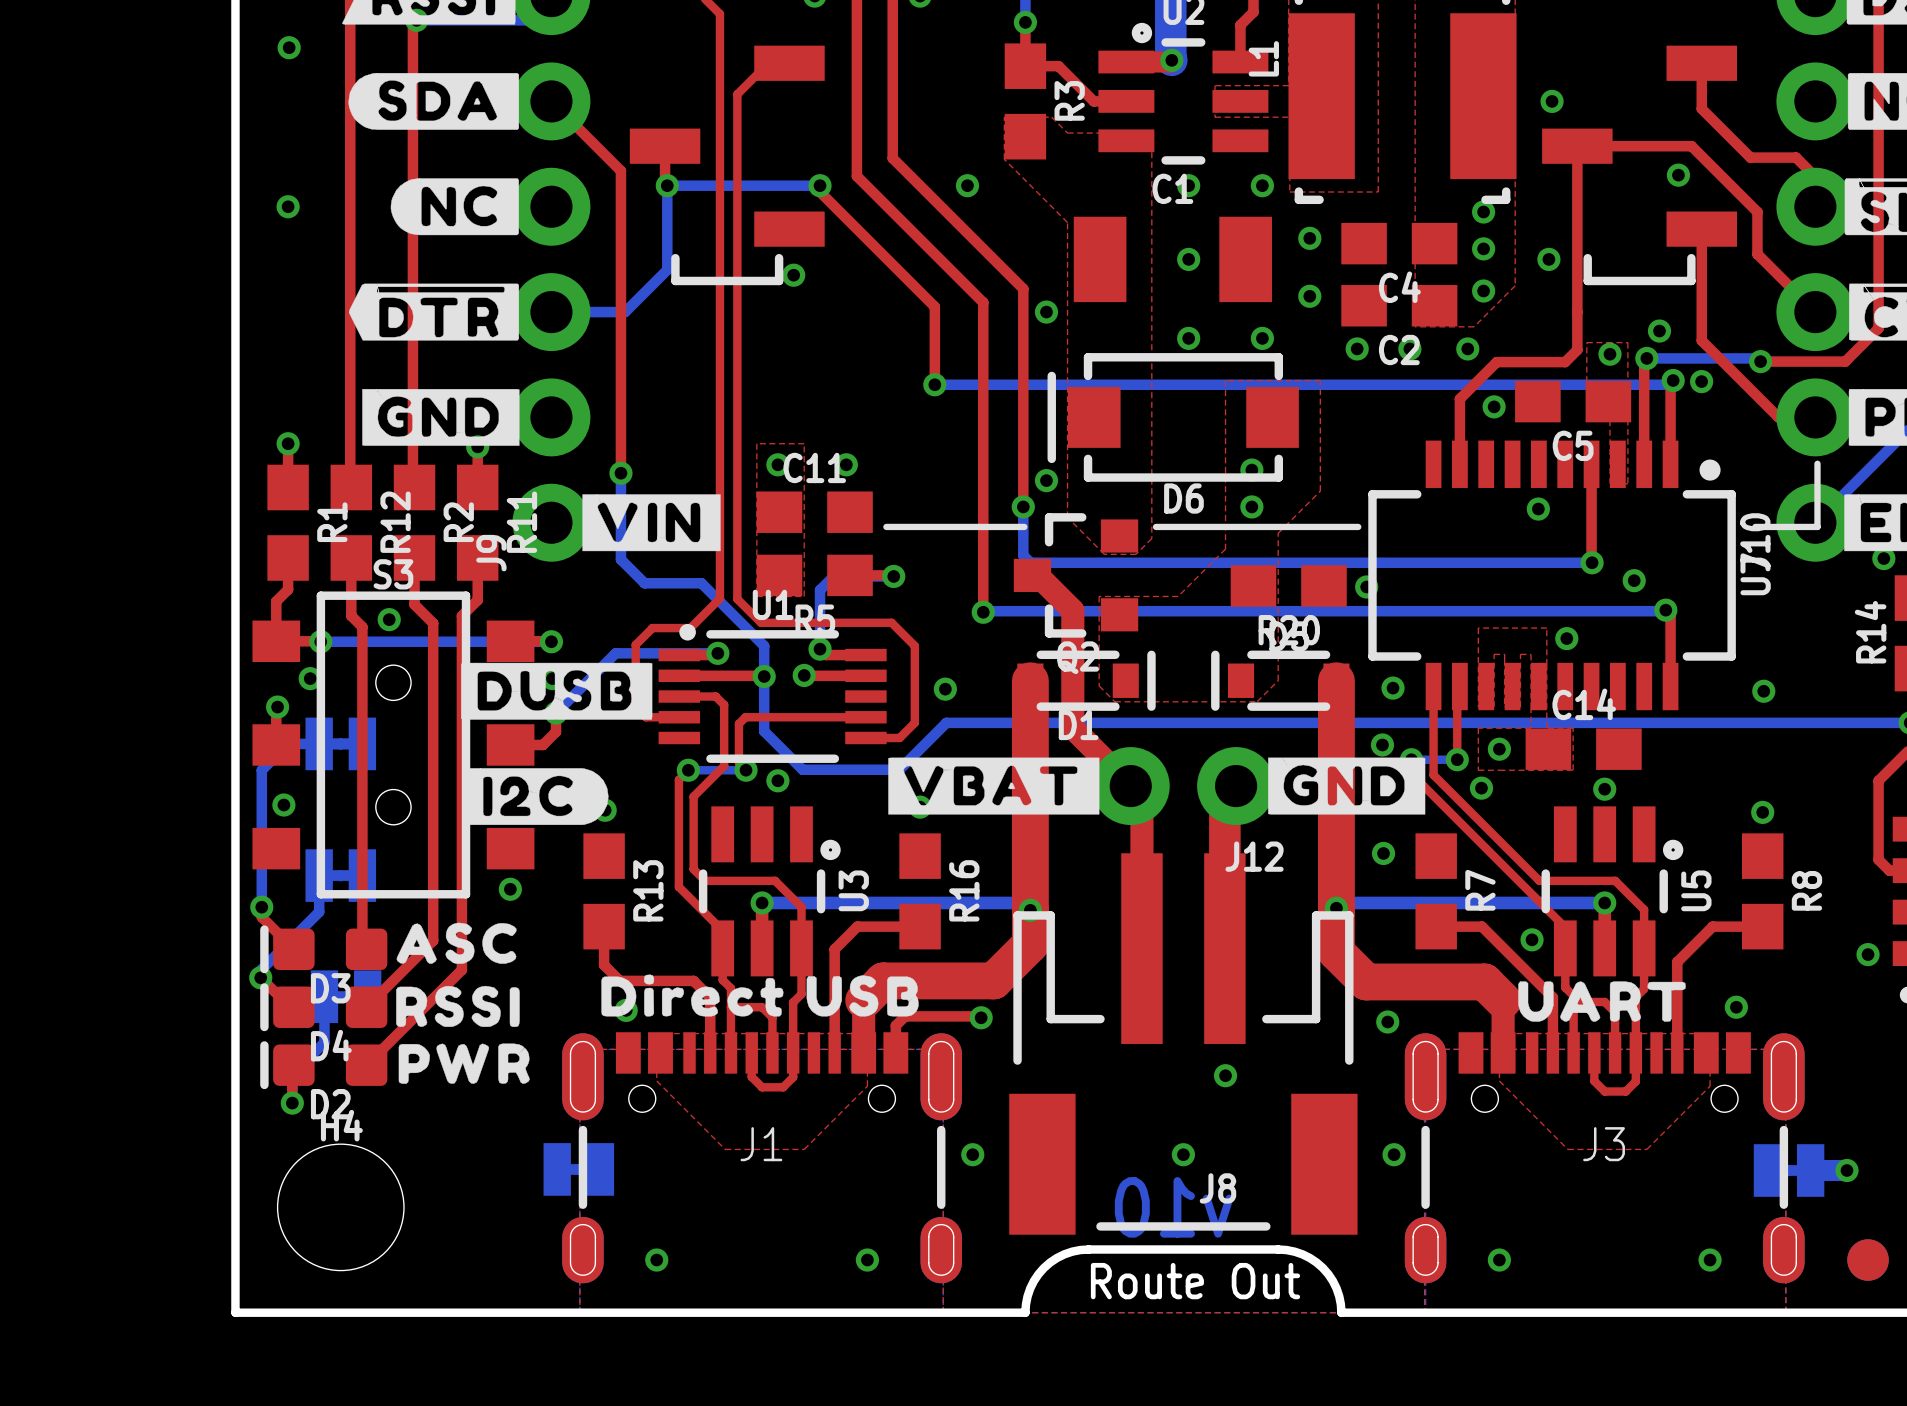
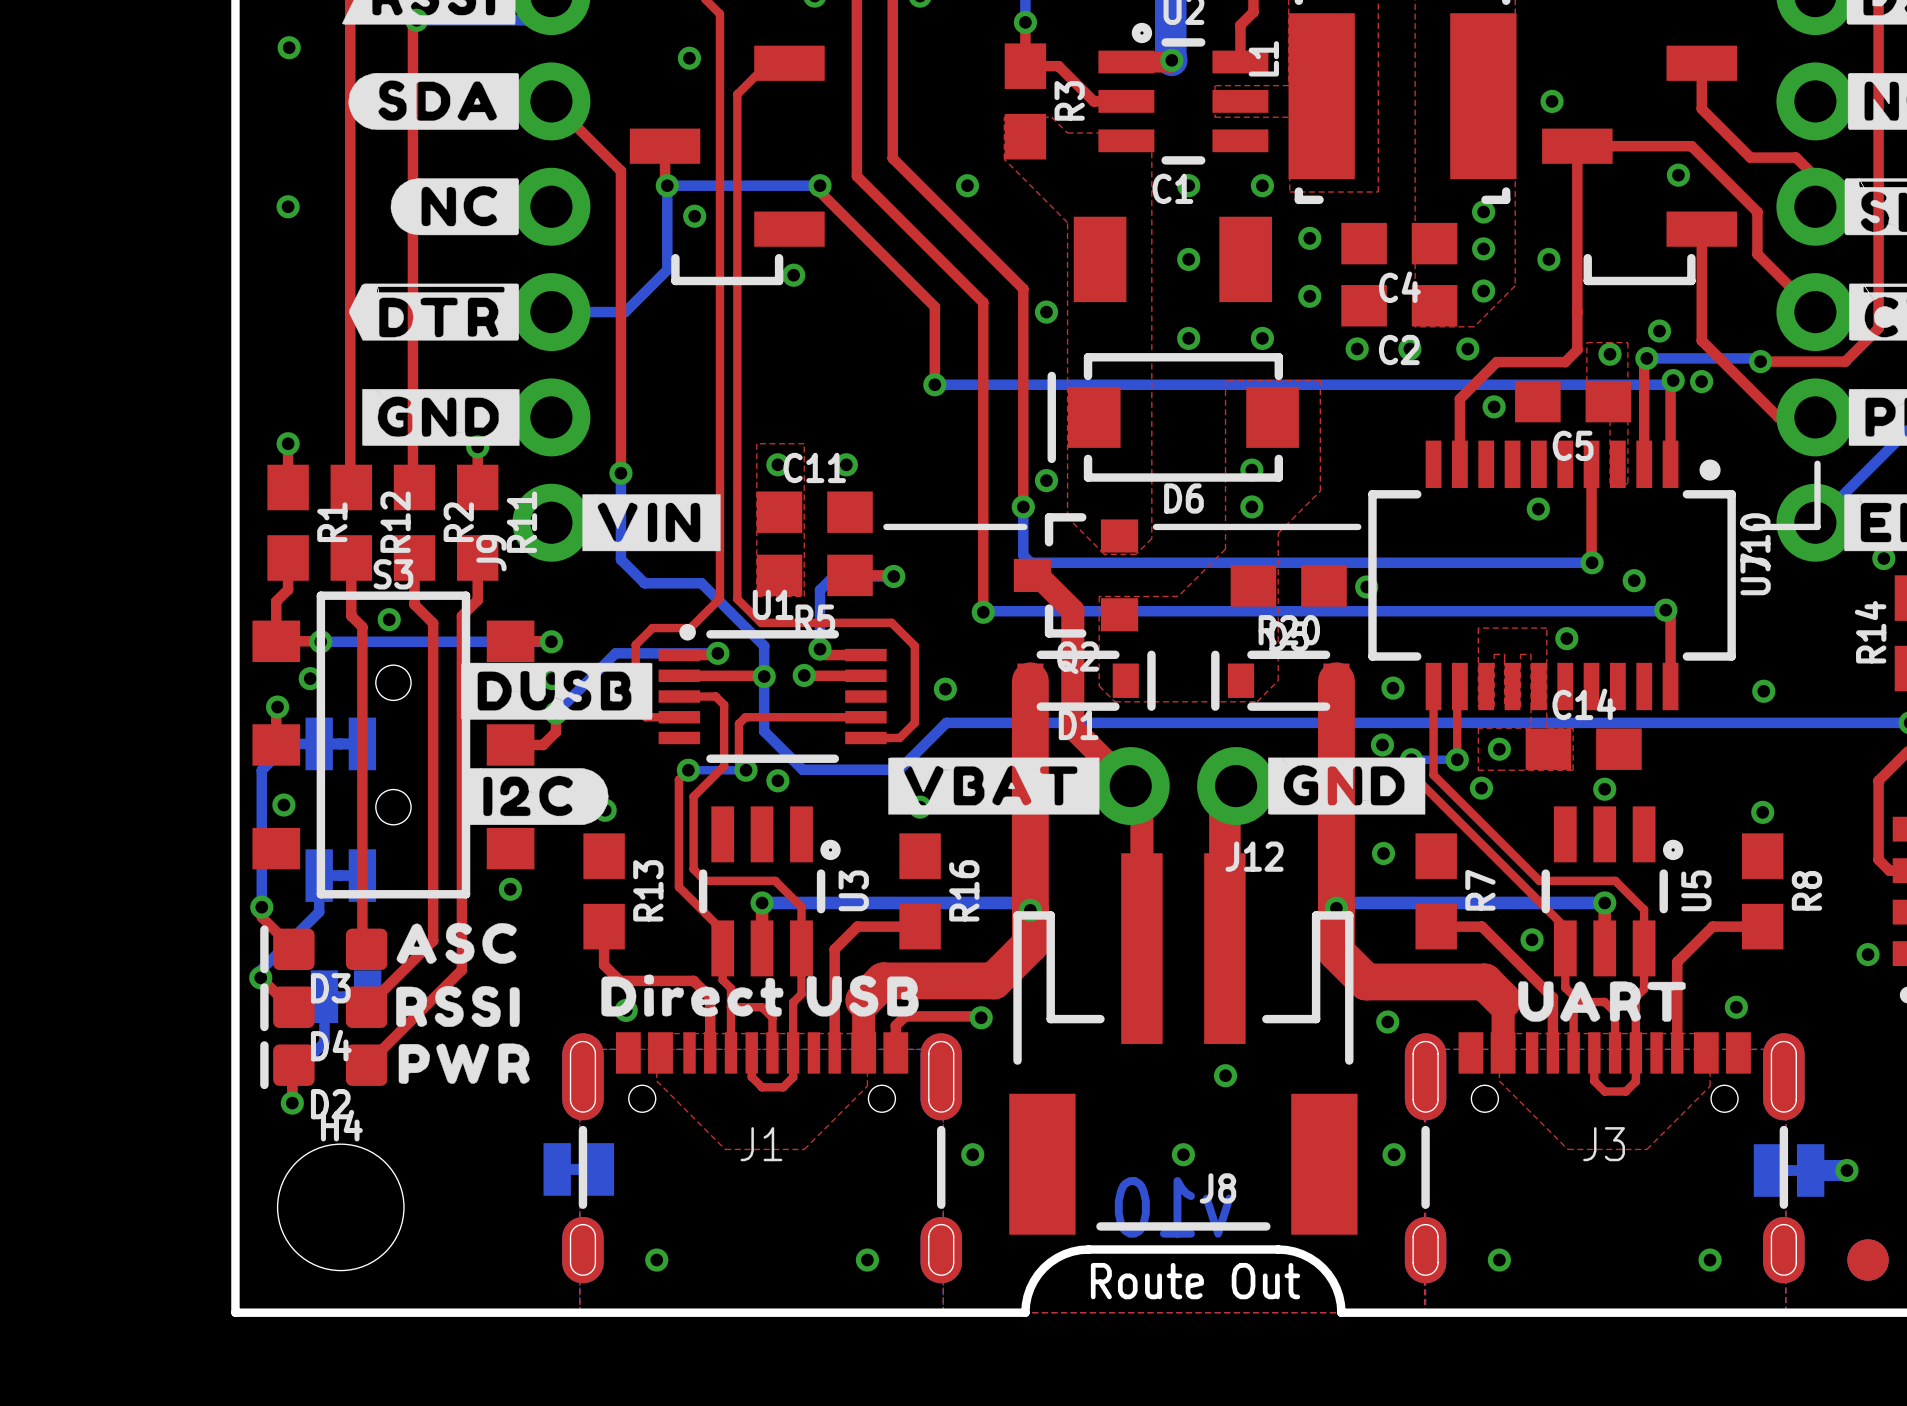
via: none -> (689, 58)
via: none -> (694, 216)

